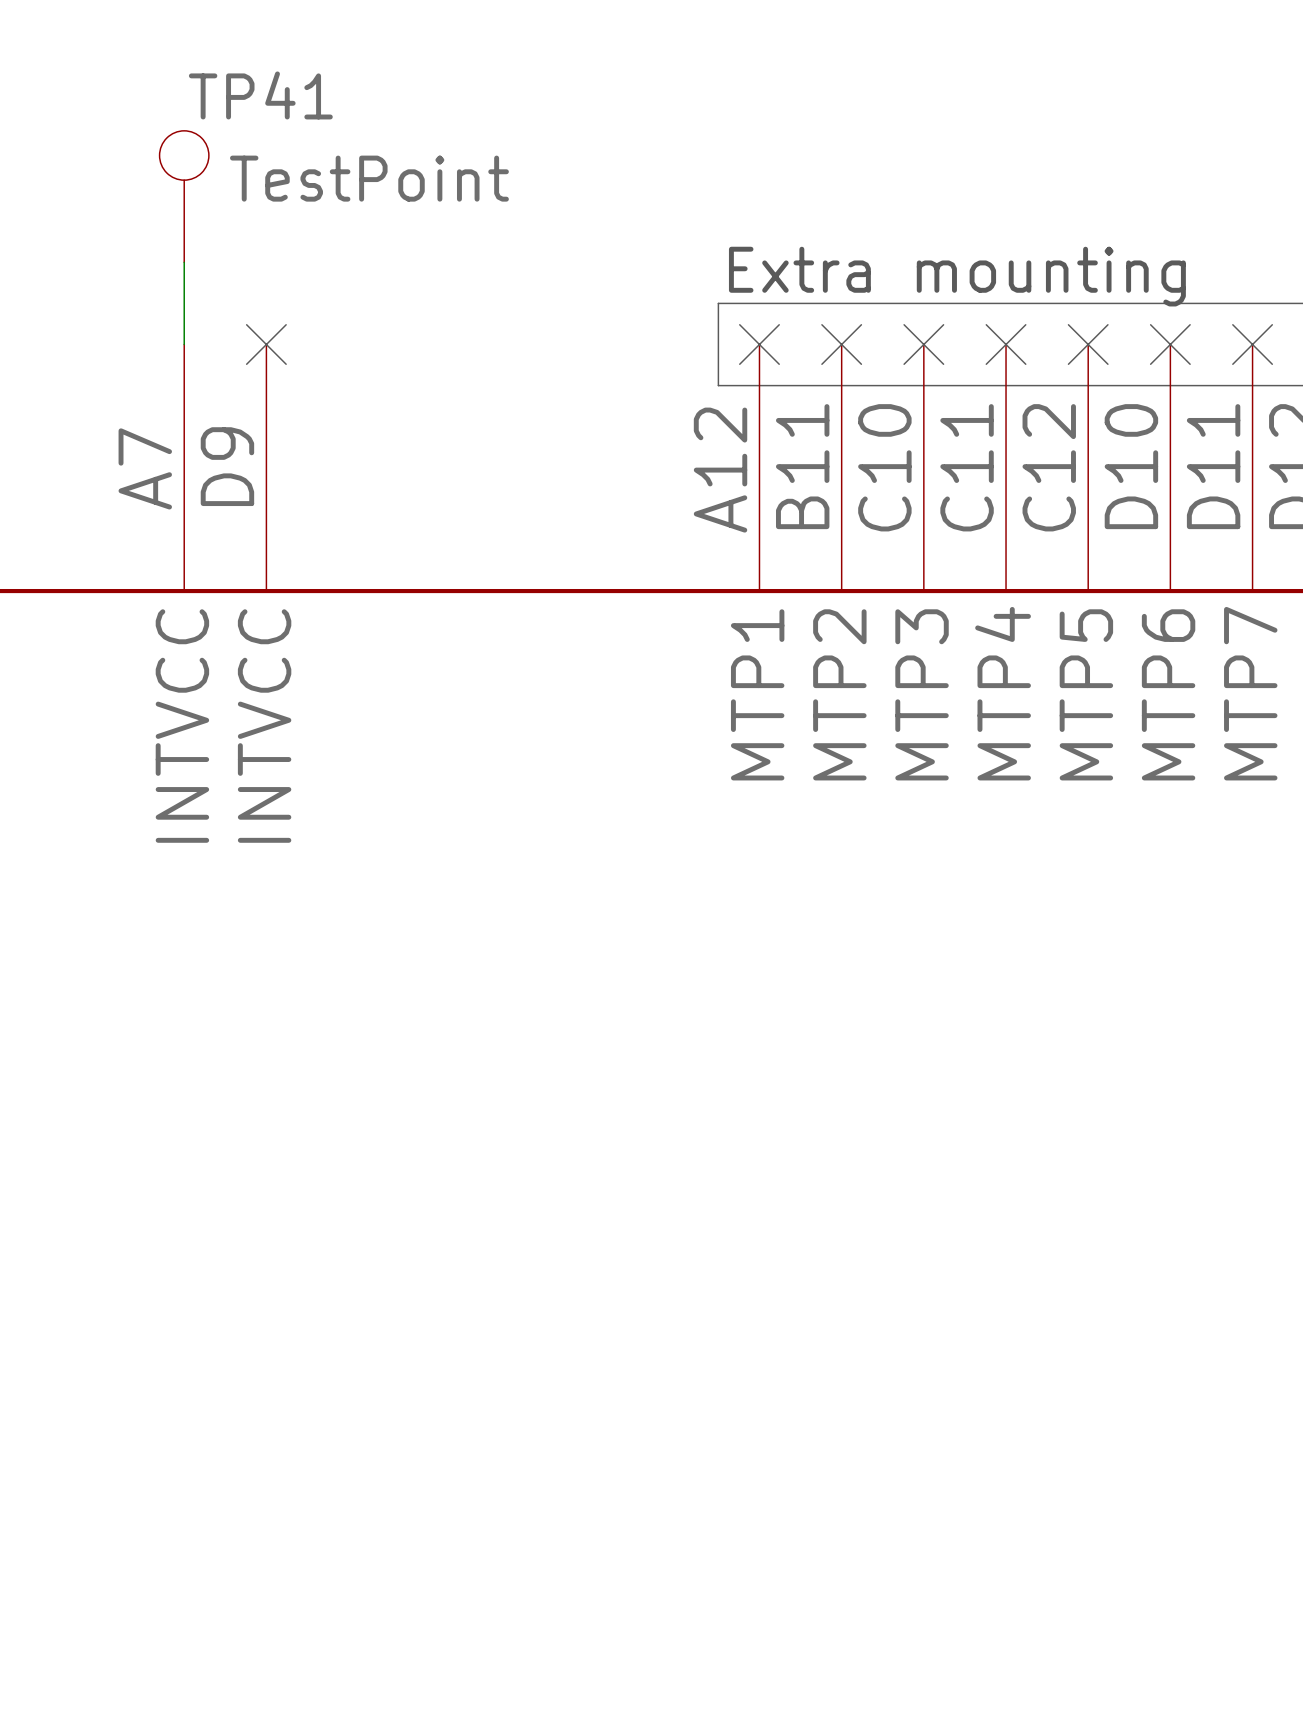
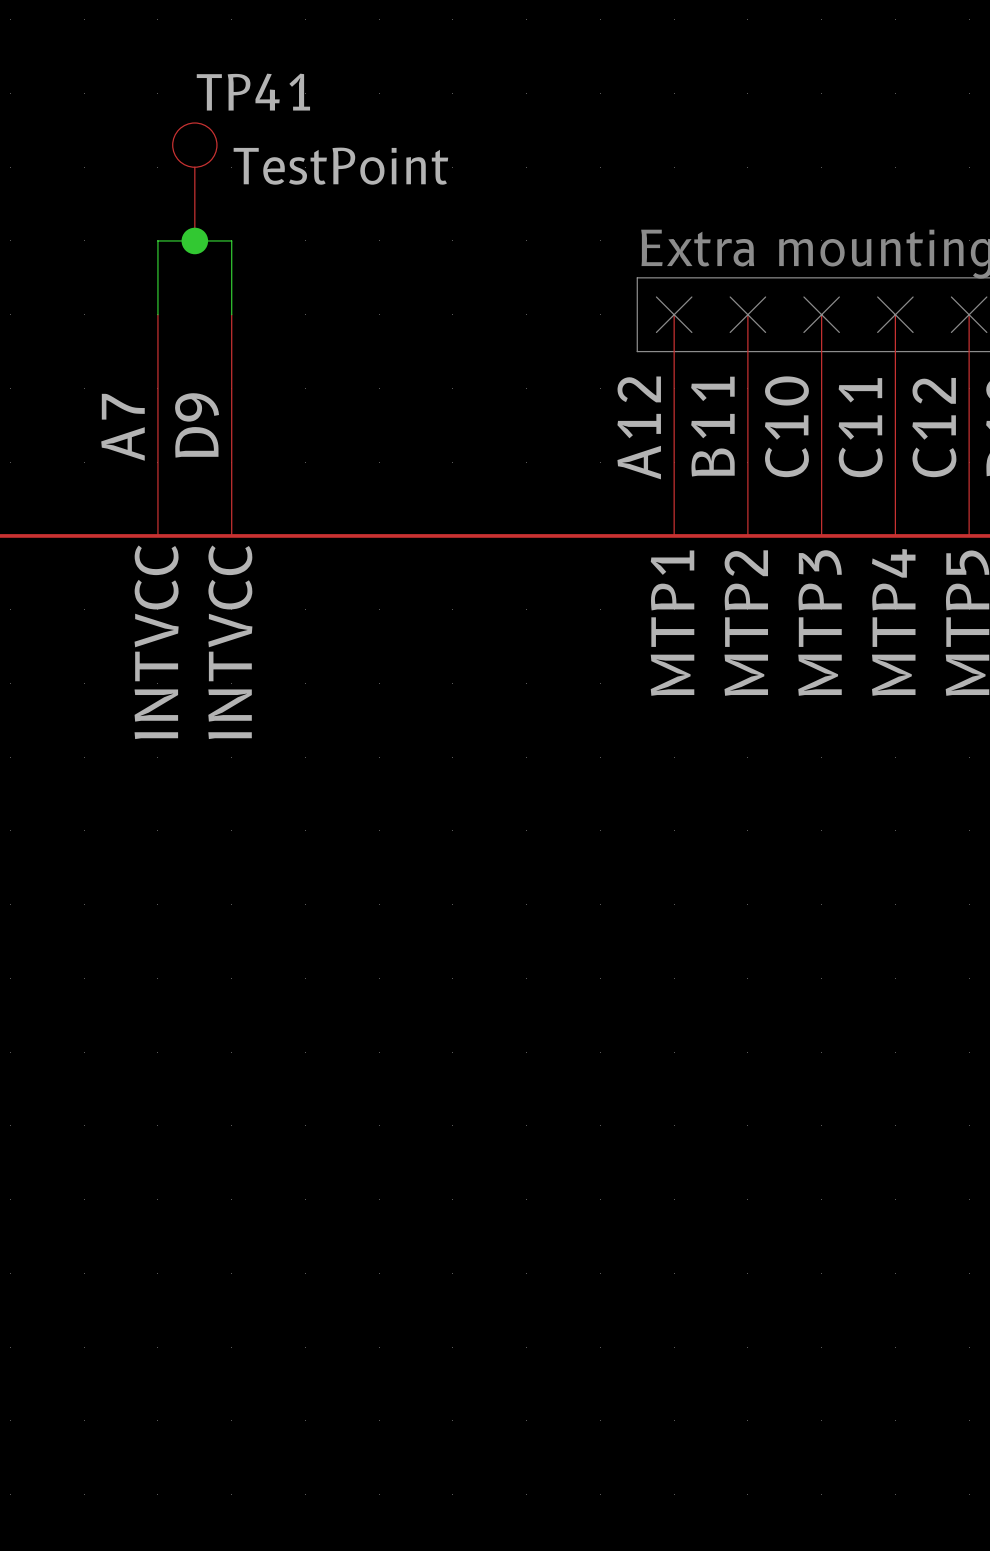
TP41 position: (184, 196) -> (194, 181)
wire: none -> (157, 240) (231, 240) (231, 314)
junction: none -> (194, 240)
no-connect mark: (266, 344) -> none

